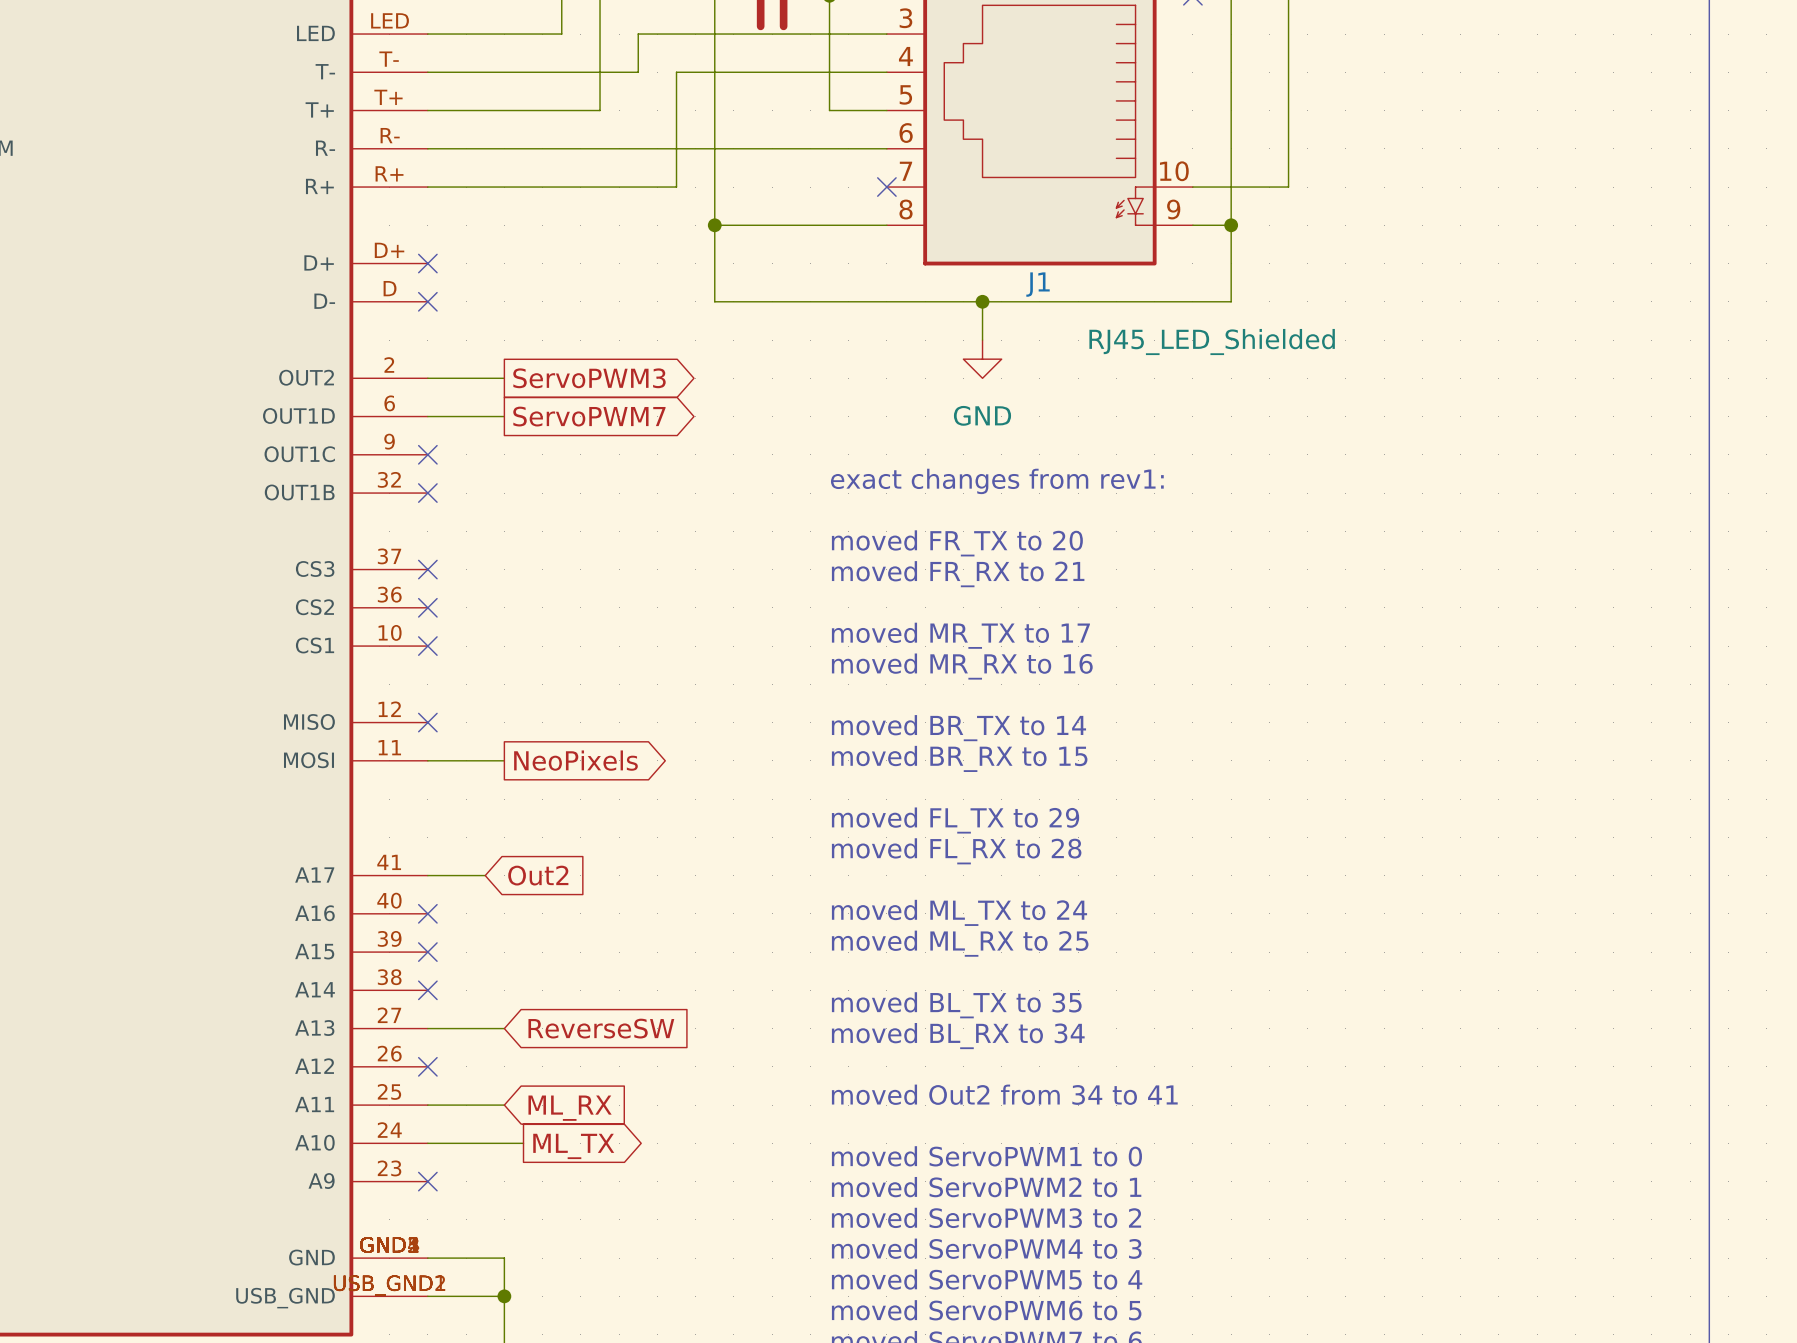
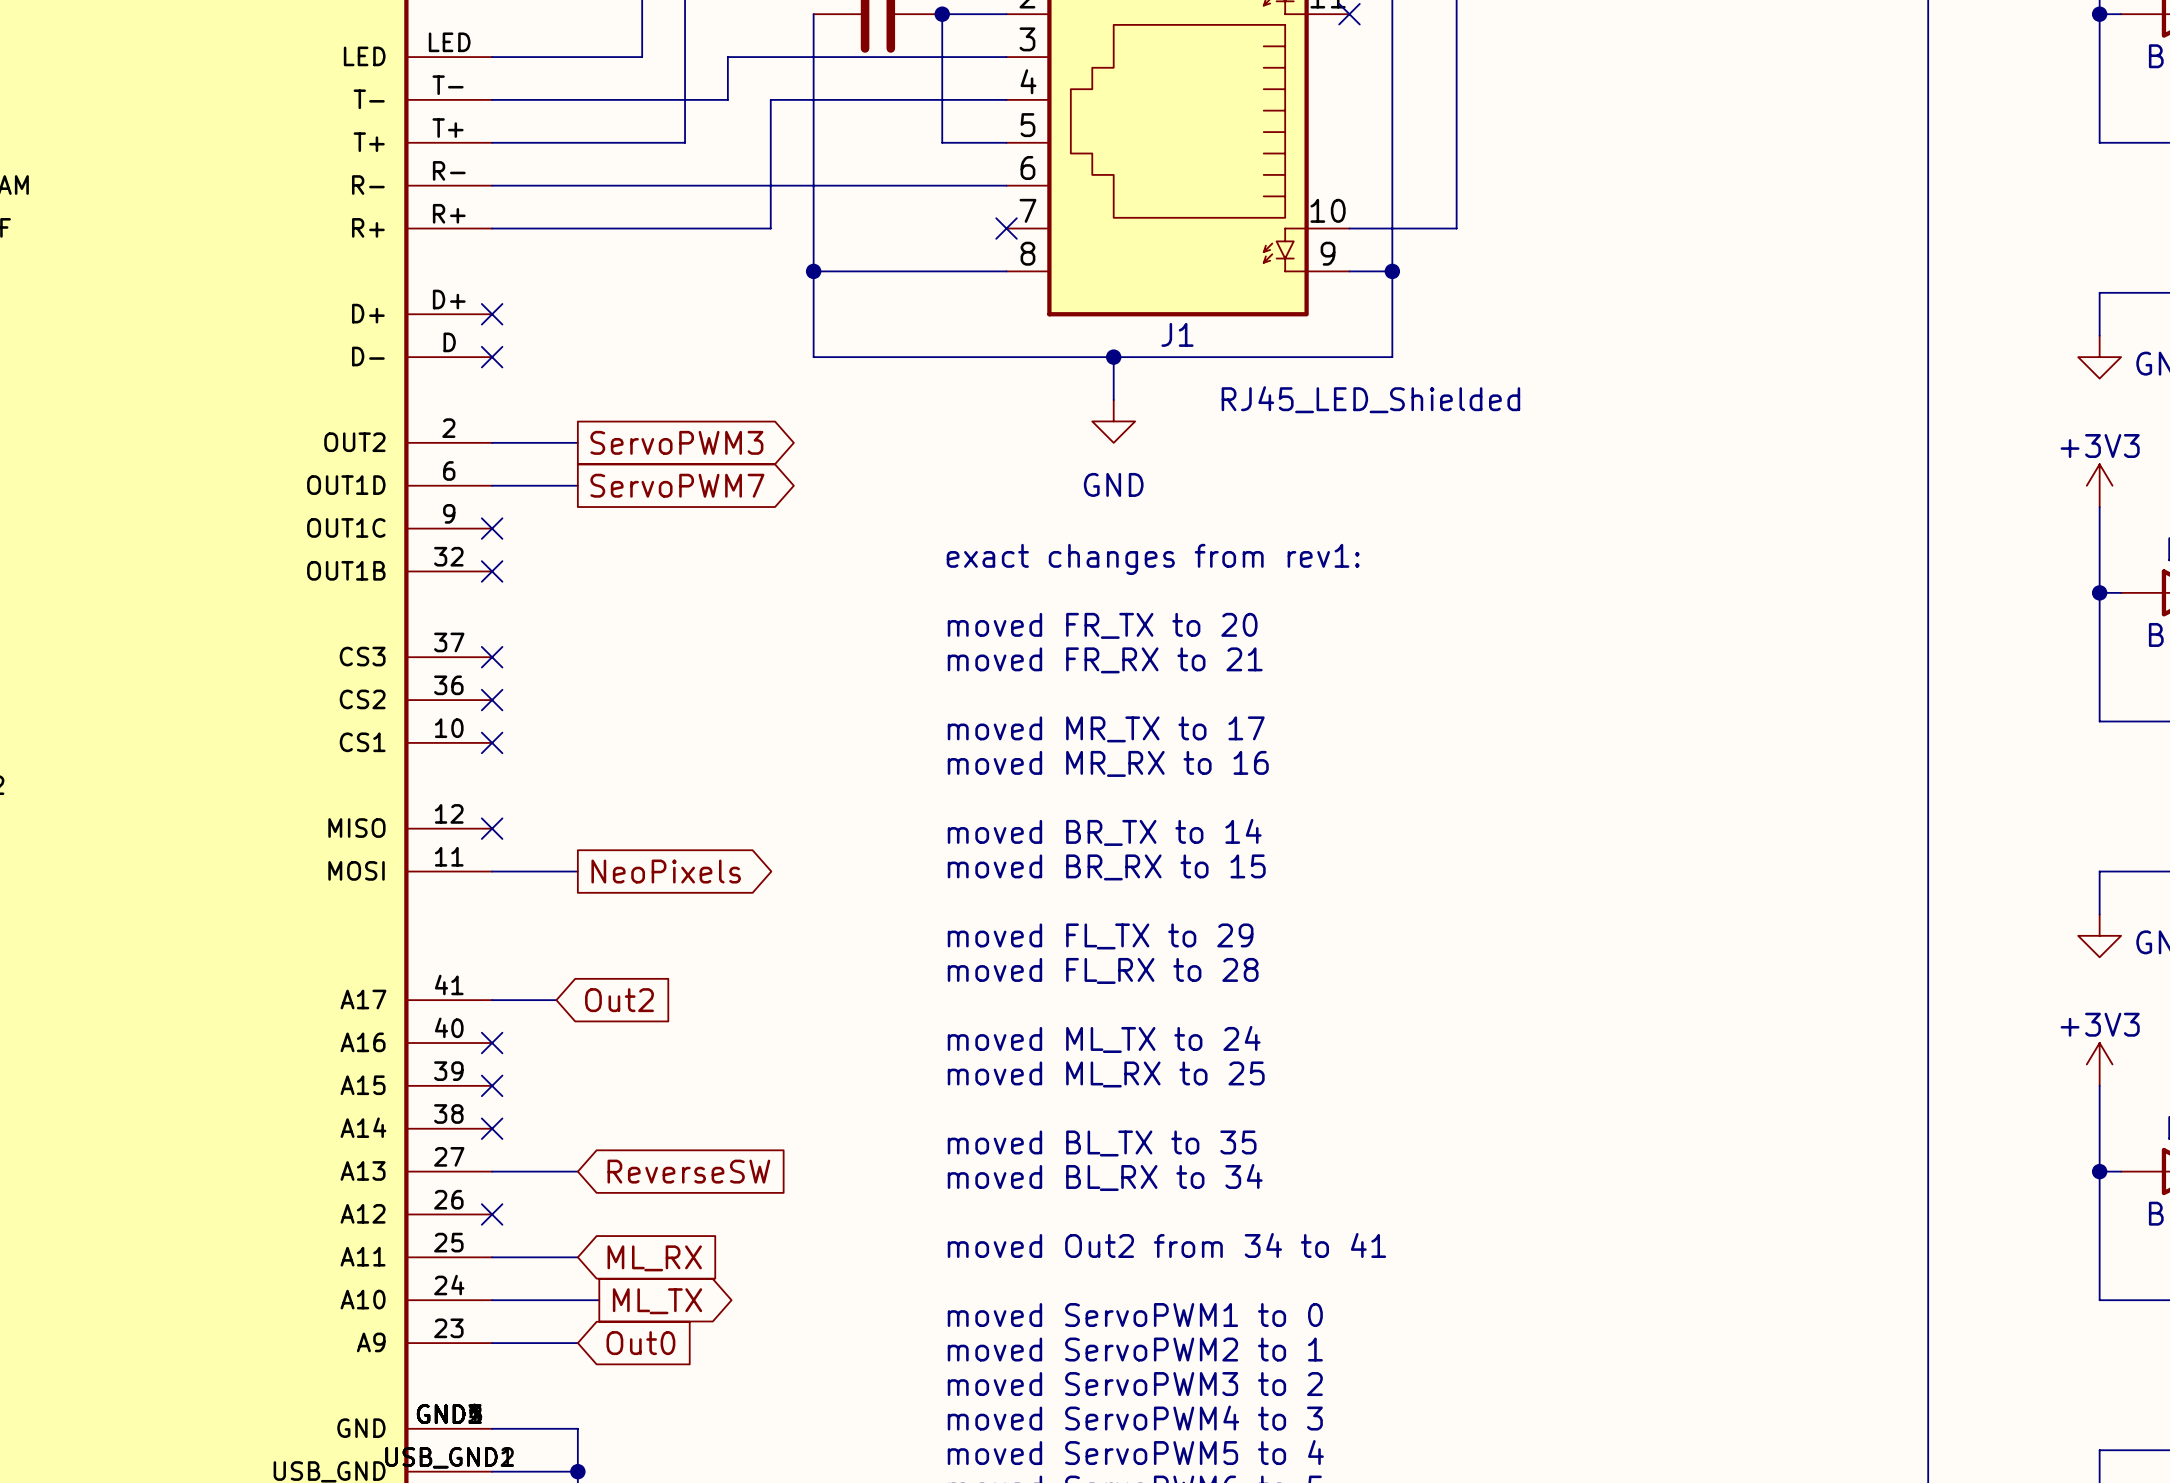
wire: none -> (492, 1343) (577, 1343)
no-connect mark: (427, 1181) -> none
global label: none -> Out0 (640, 1343)

